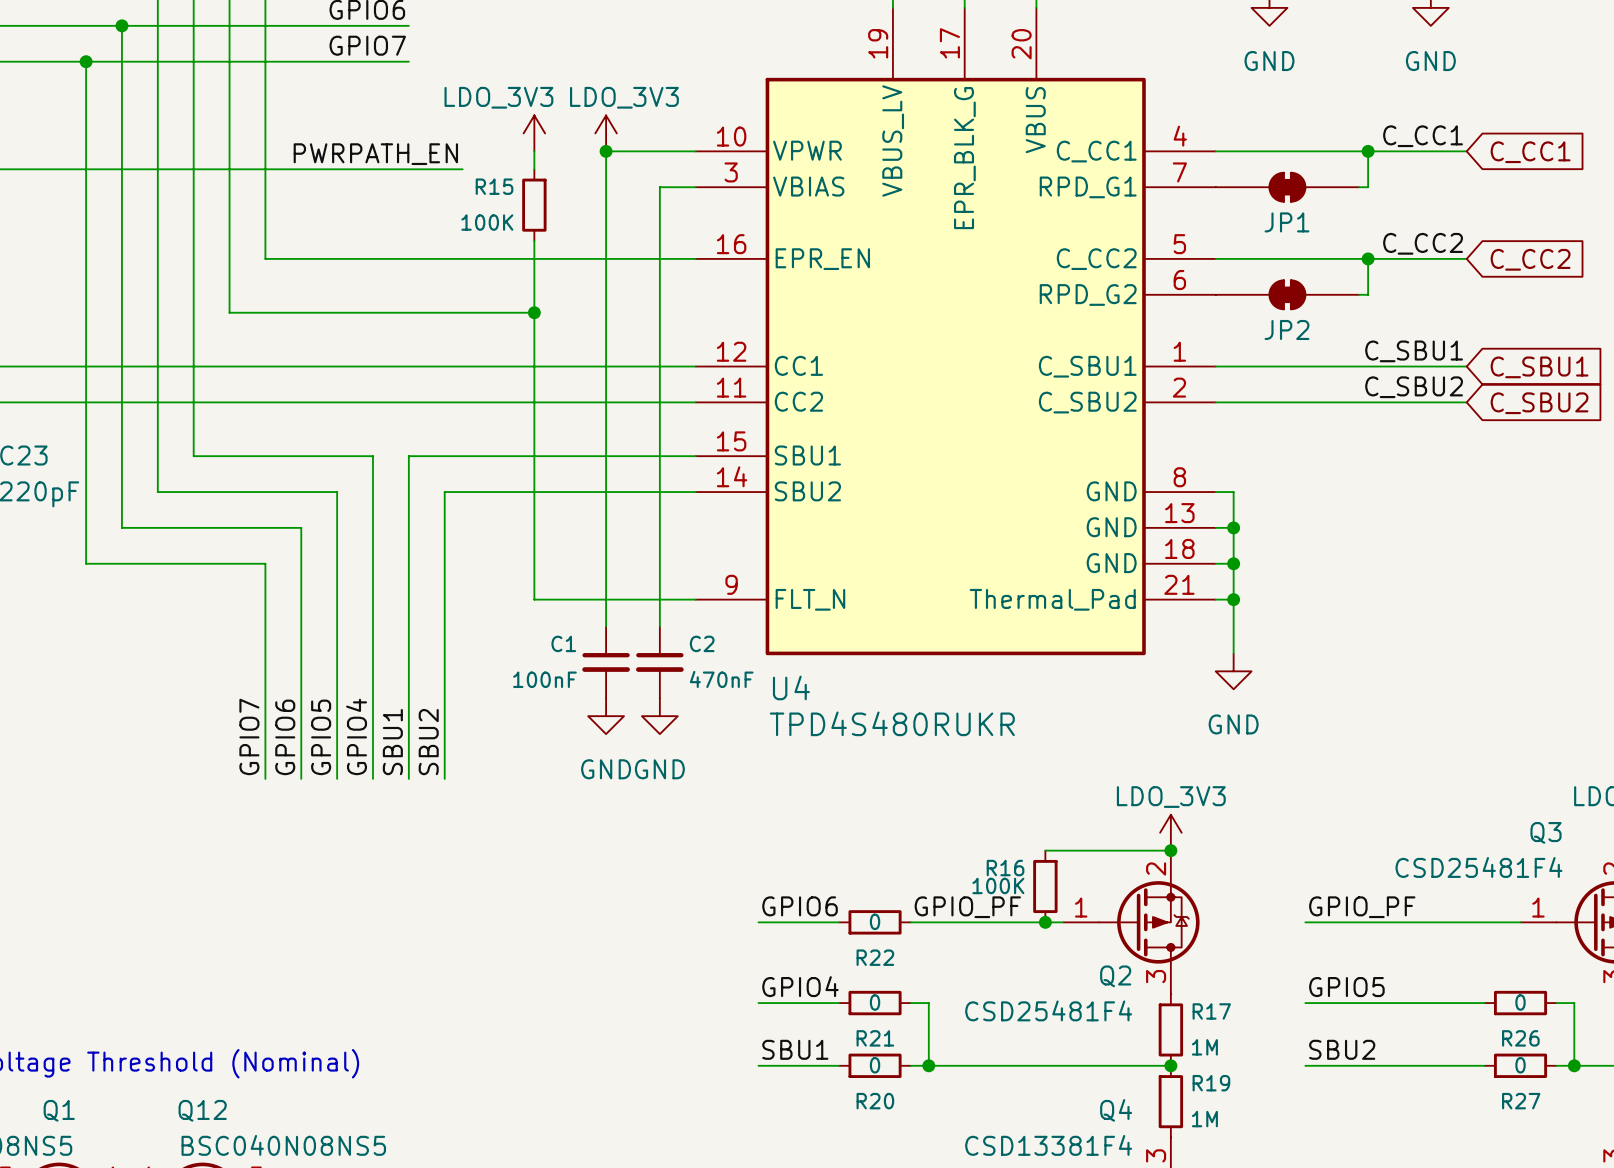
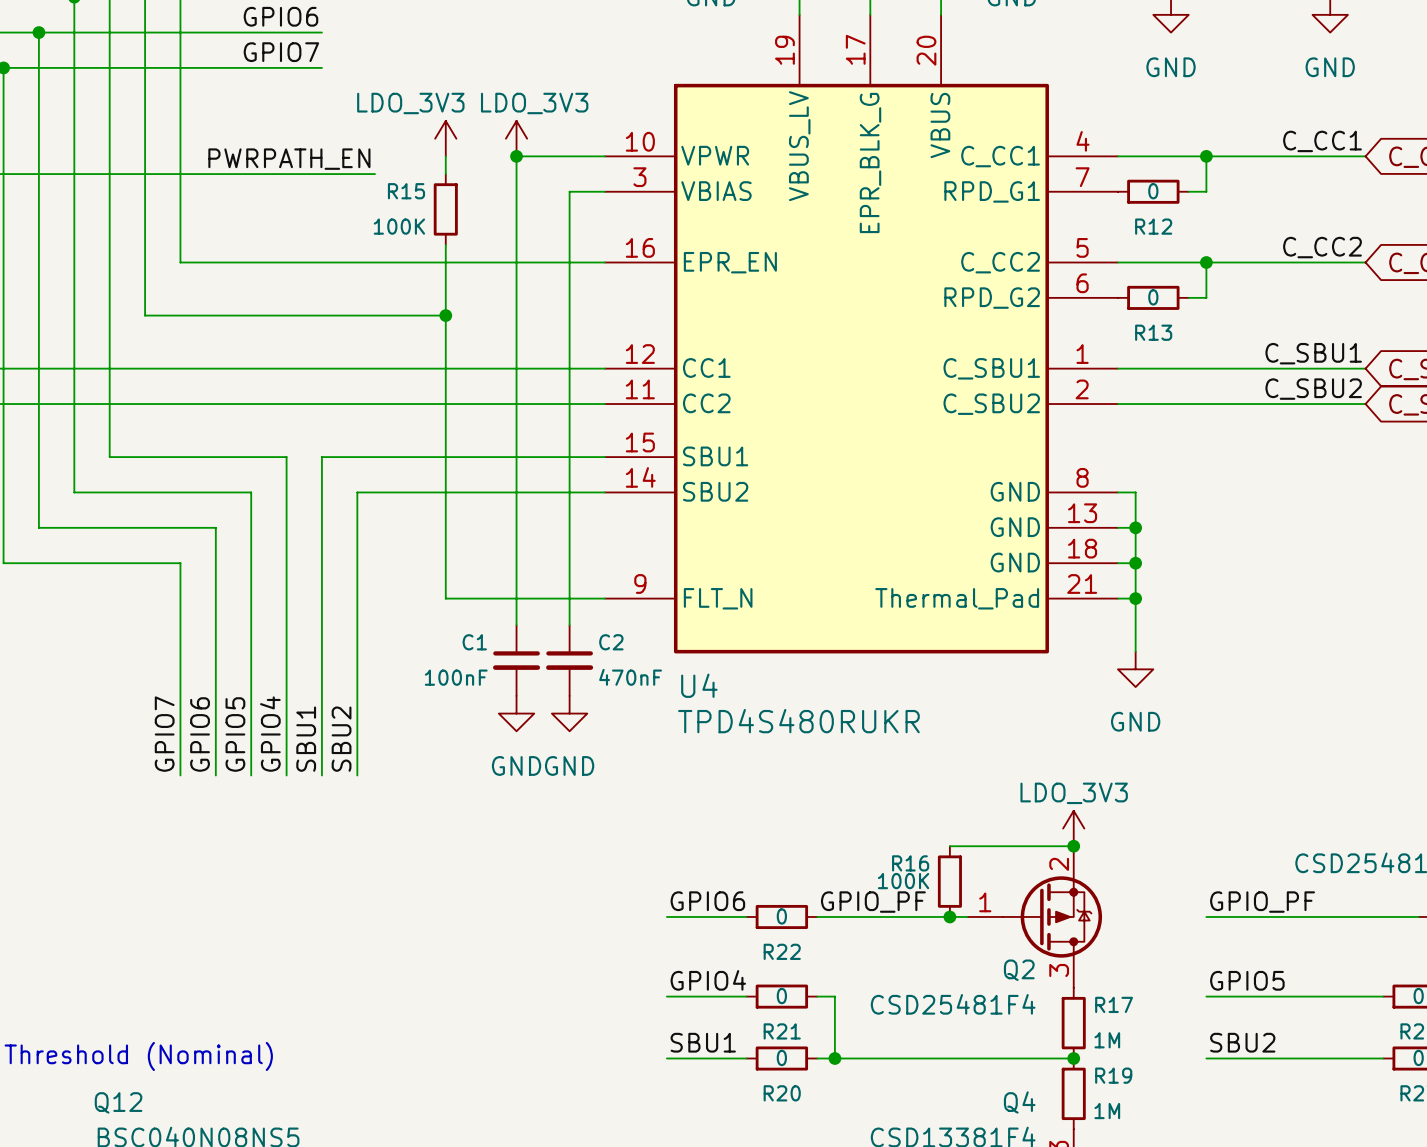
wire: none -> (1206, 156) (1206, 191) (1188, 191)
junction: none -> (1206, 156)
wire: (1368, 151) (1368, 187) (1359, 187) -> none
junction: (1368, 151) -> none
R12: none -> 0 (1153, 191)
JP1: (1287, 187) -> none
wire: none -> (1206, 262) (1206, 297) (1188, 297)
junction: none -> (1206, 262)
wire: (1368, 258) (1368, 294) (1359, 294) -> none
junction: (1368, 258) -> none
R13: none -> 0 (1153, 297)
JP2: (1287, 294) -> none

